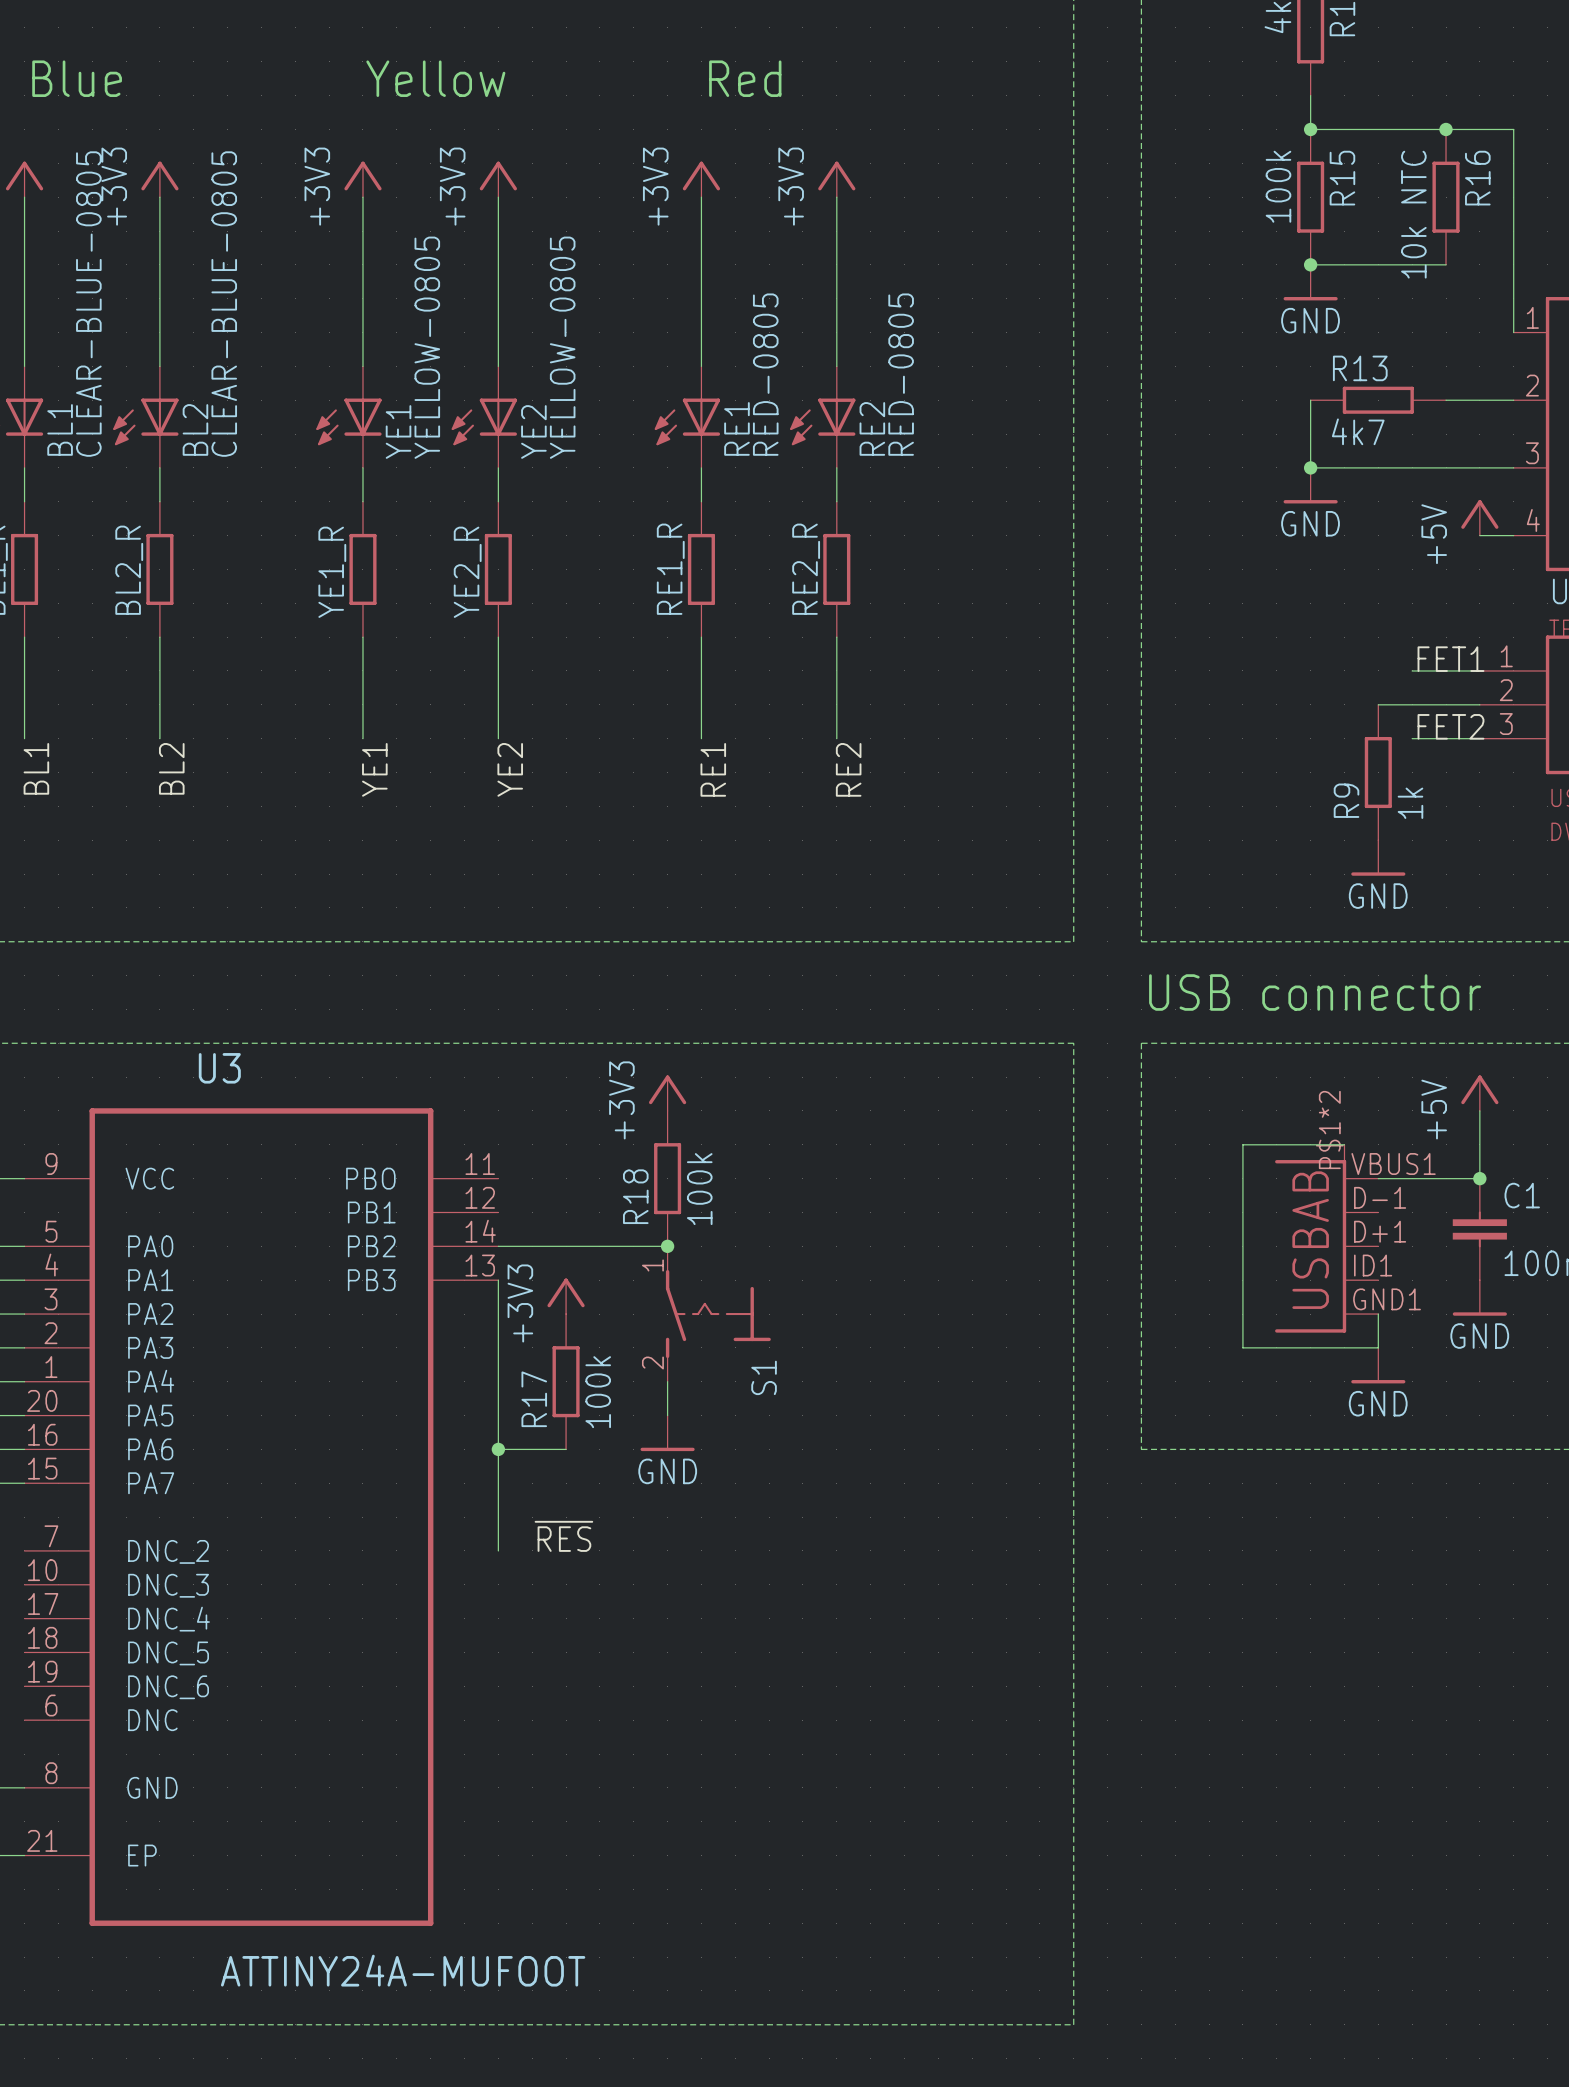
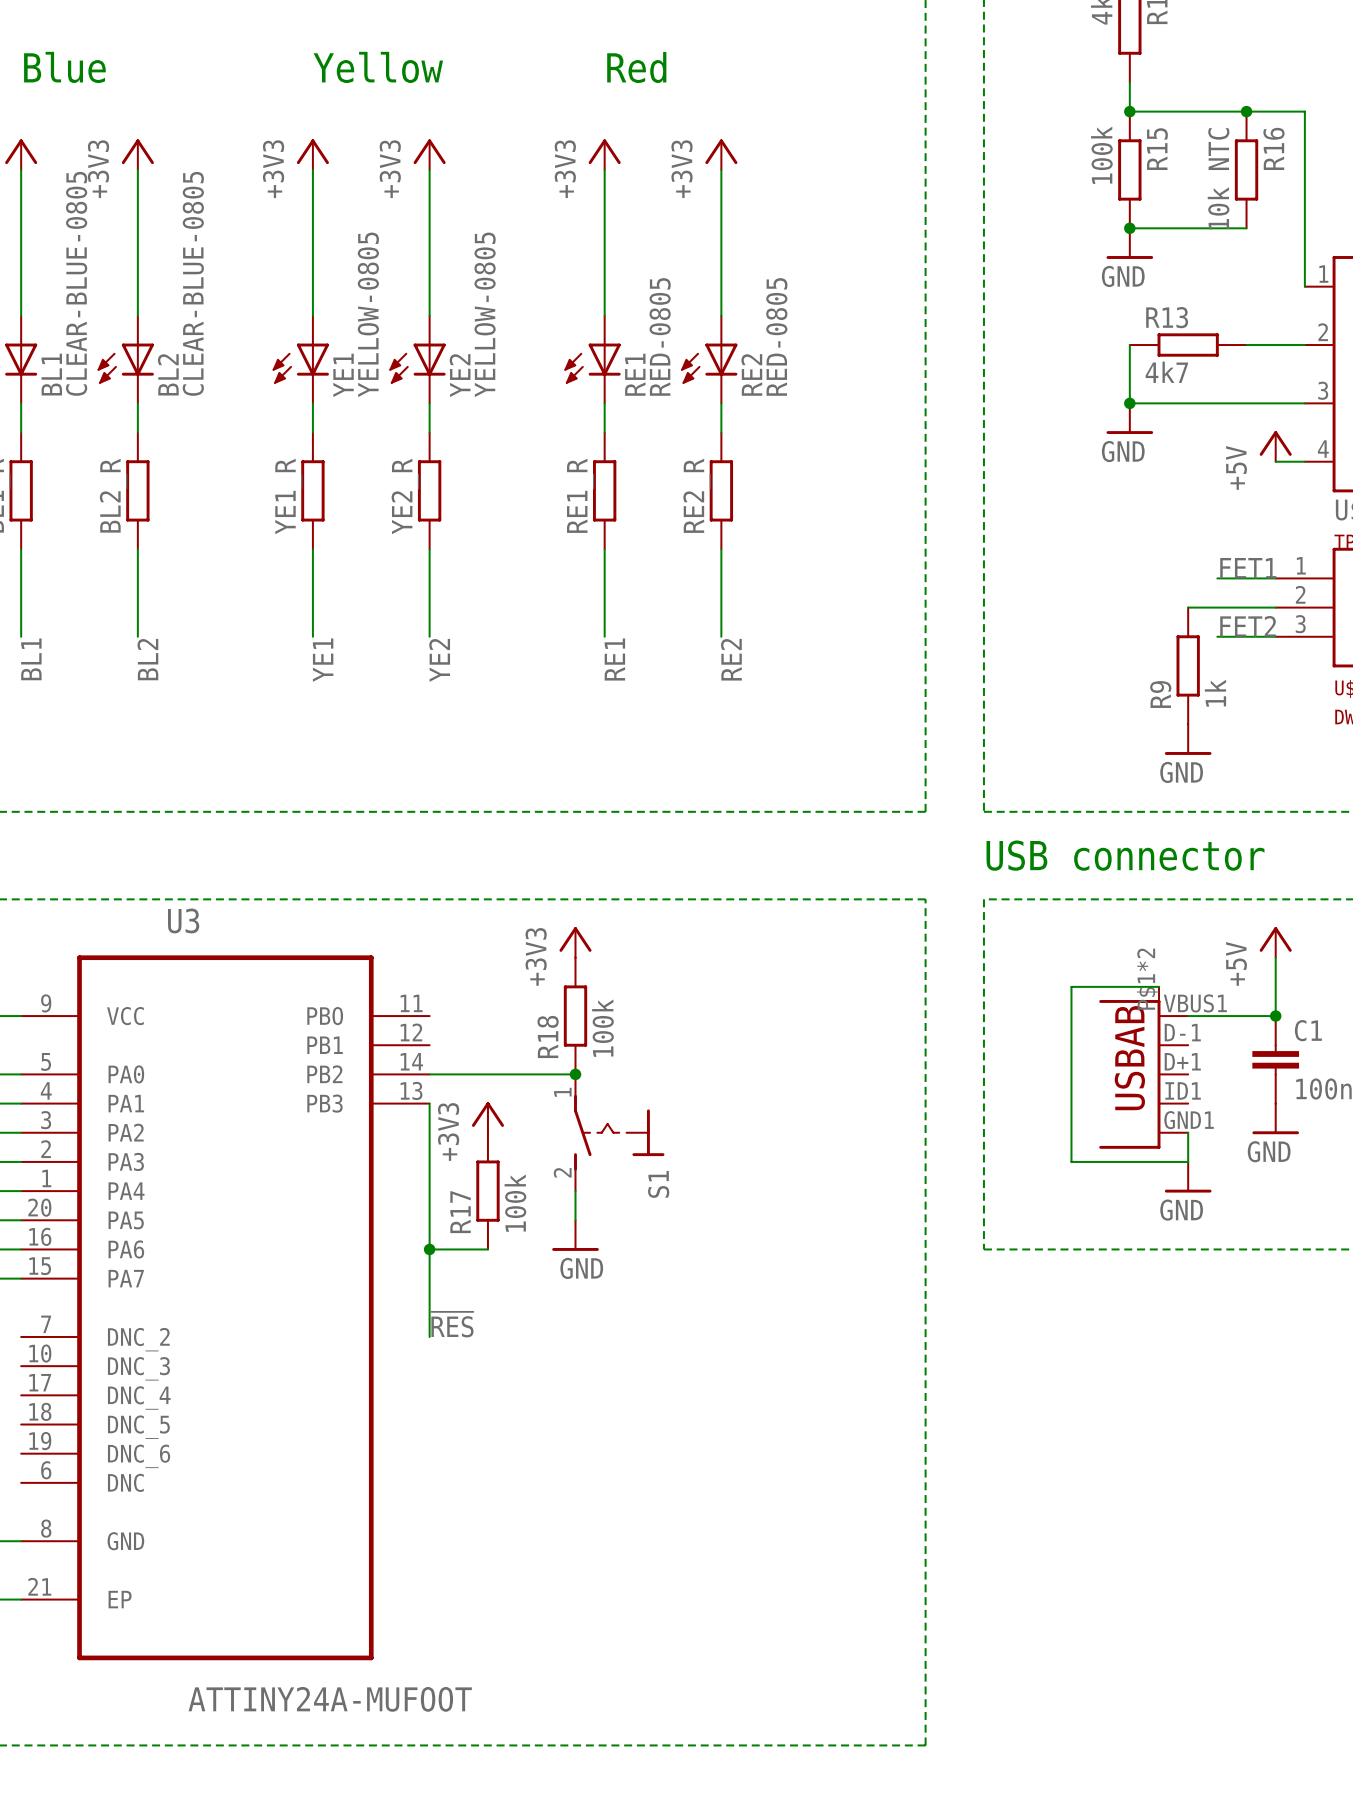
label position: ~{RES} (563, 1536) -> ~{RES} (452, 1324)

